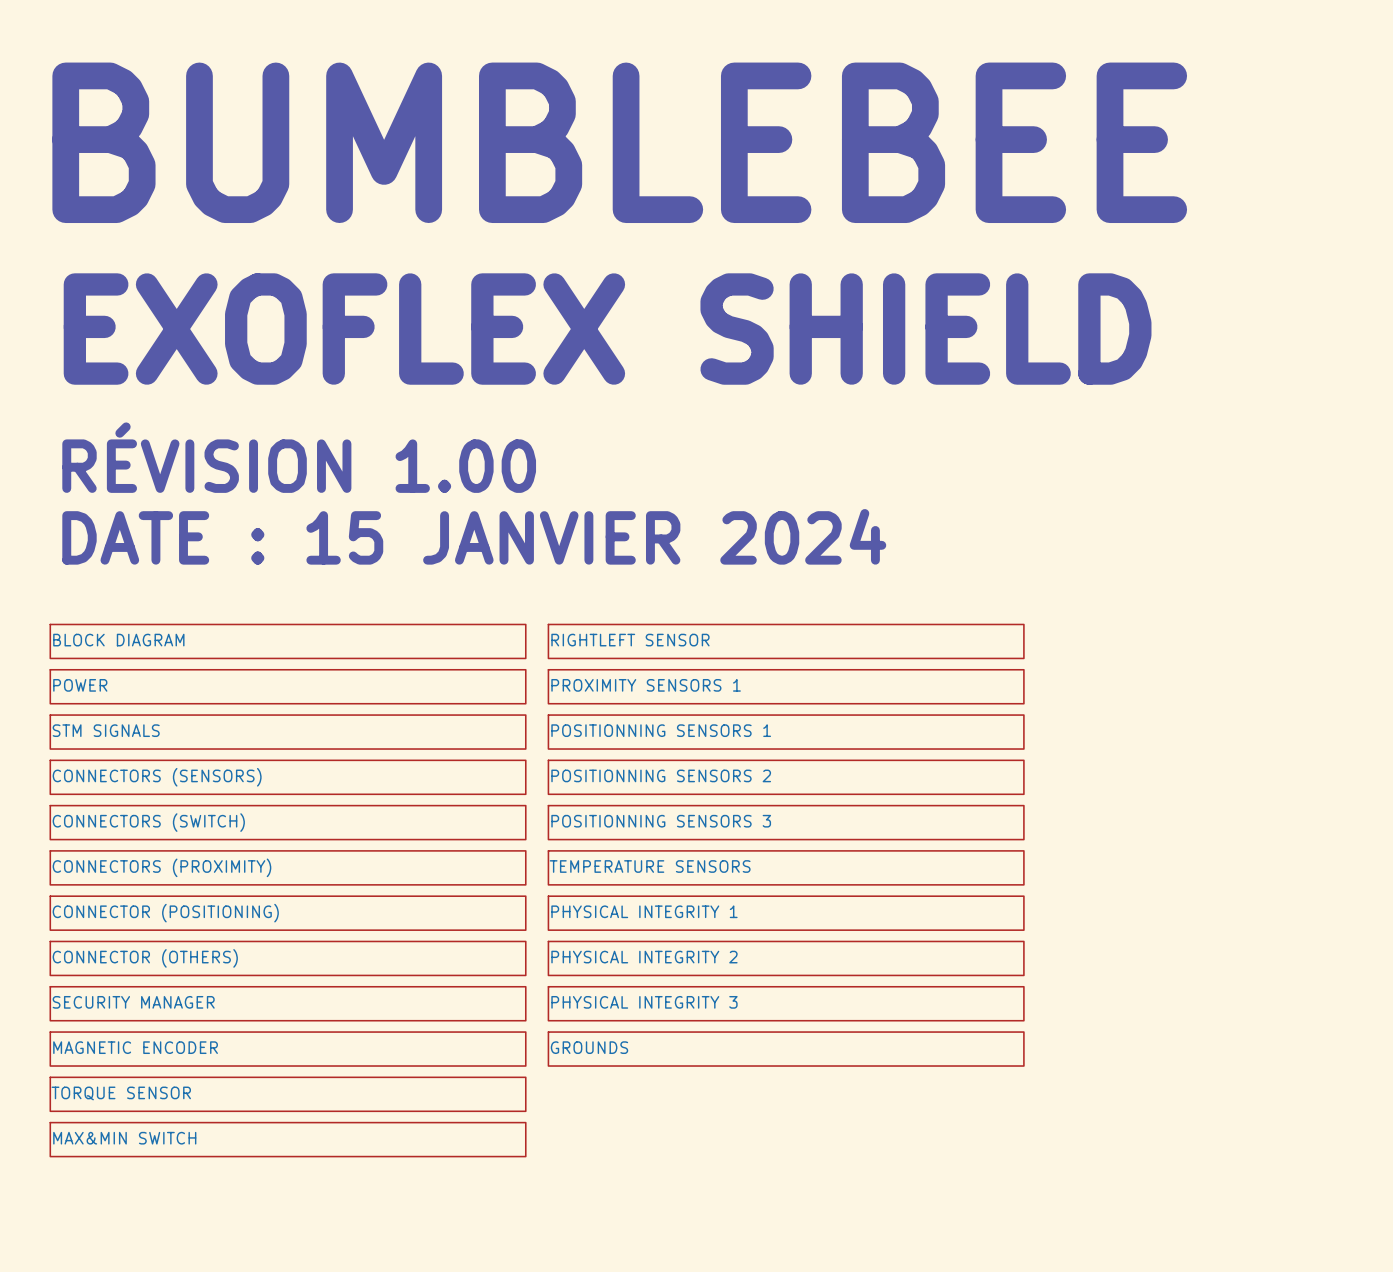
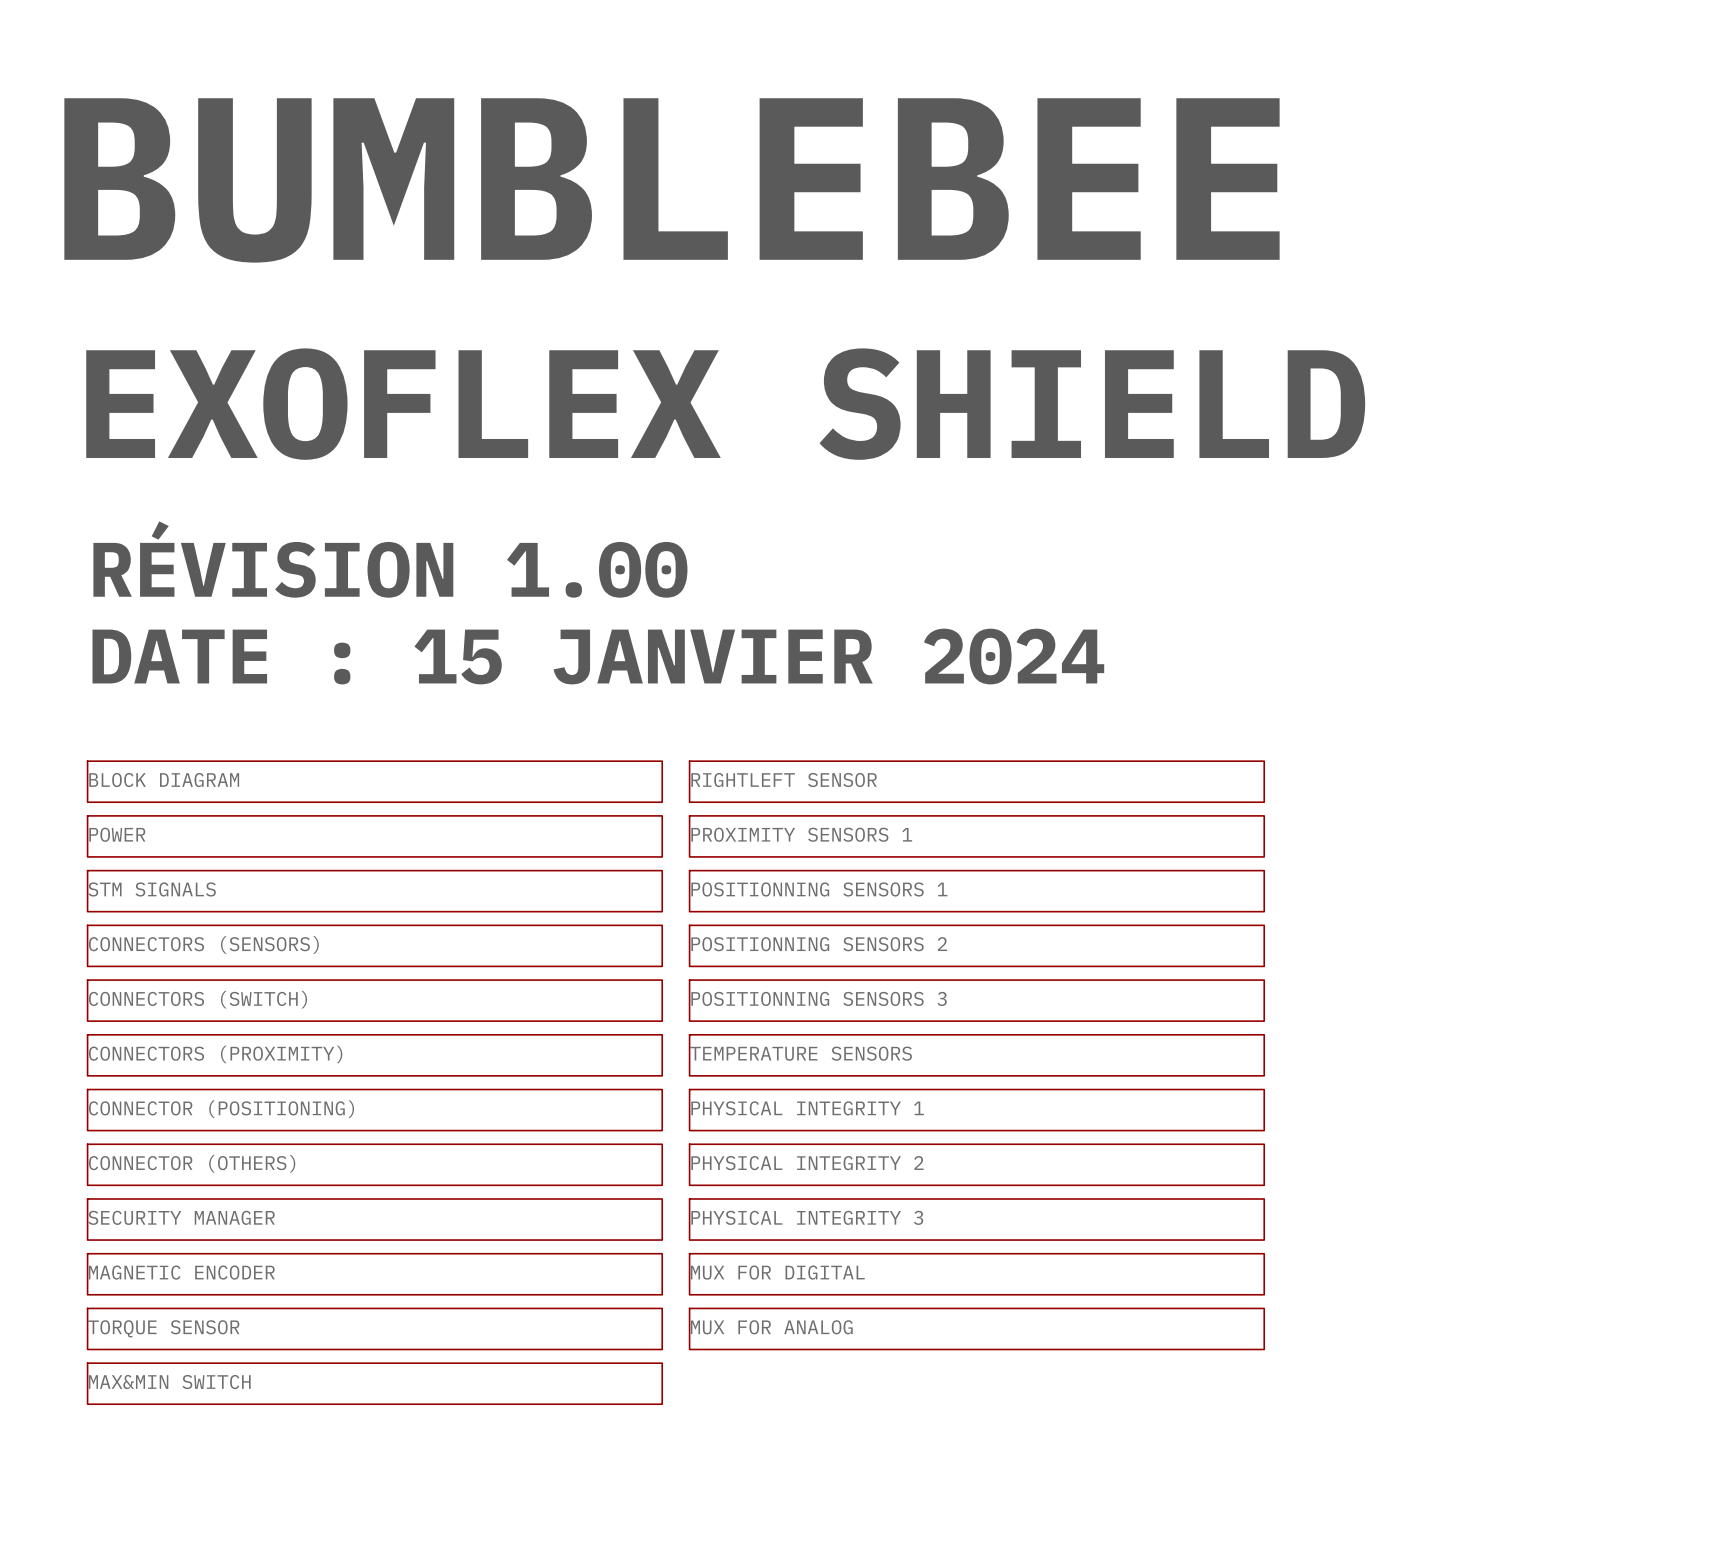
sheet GROUNDS name: GROUNDS (589, 1047) -> MUX FOR DIGITAL (777, 1272)
sheet MUX FOR ANALOG: none -> (976, 1328)

